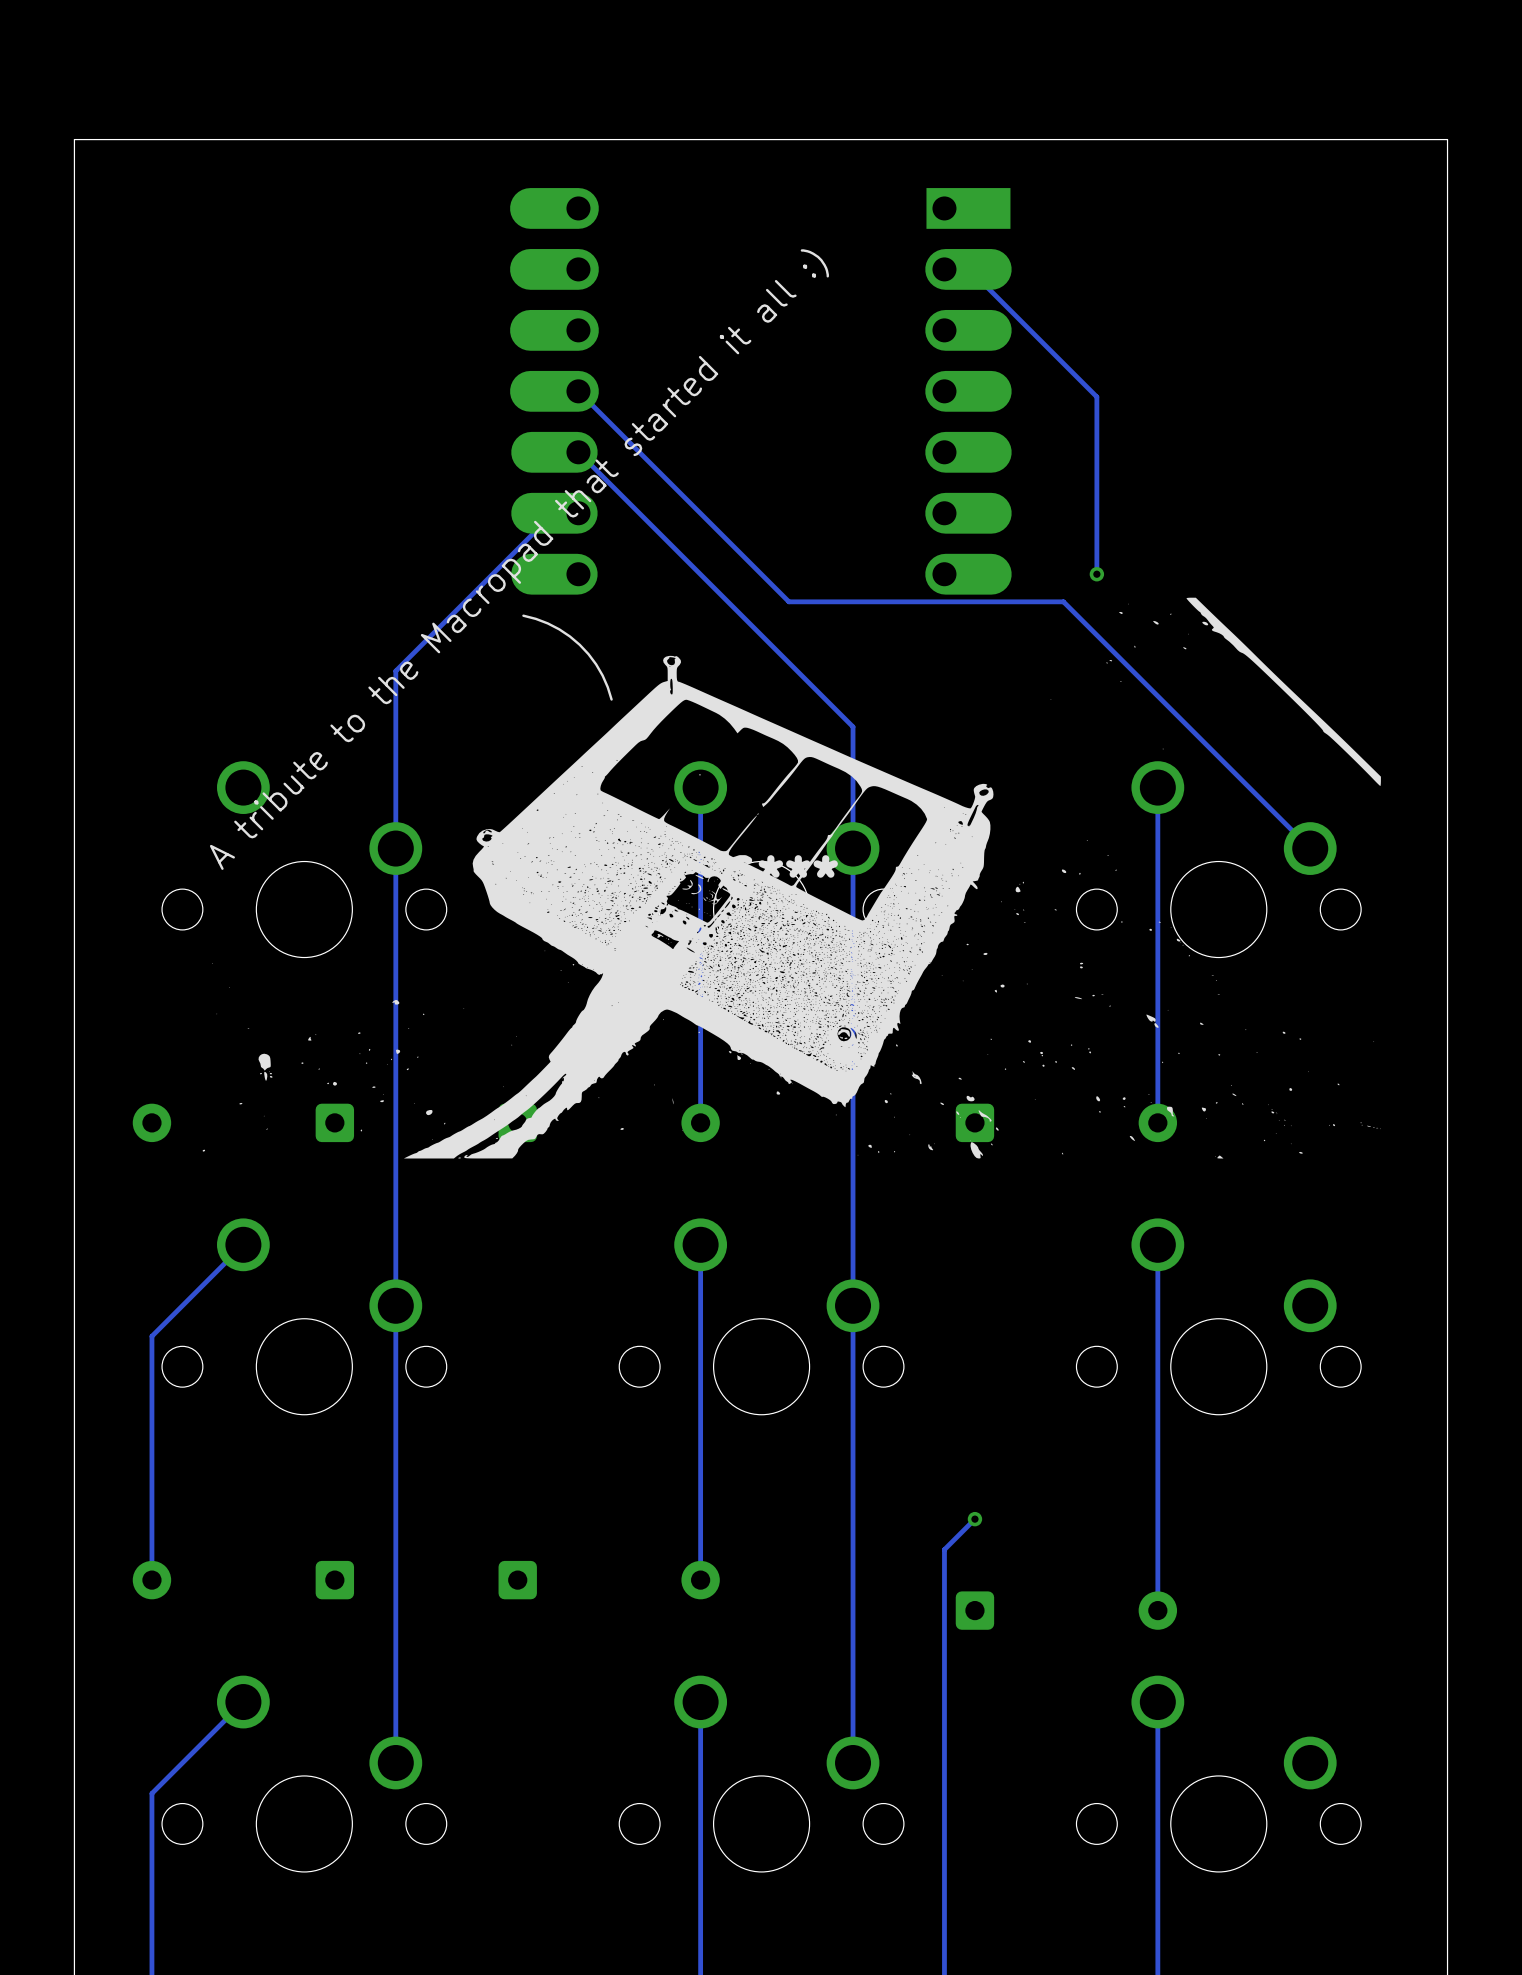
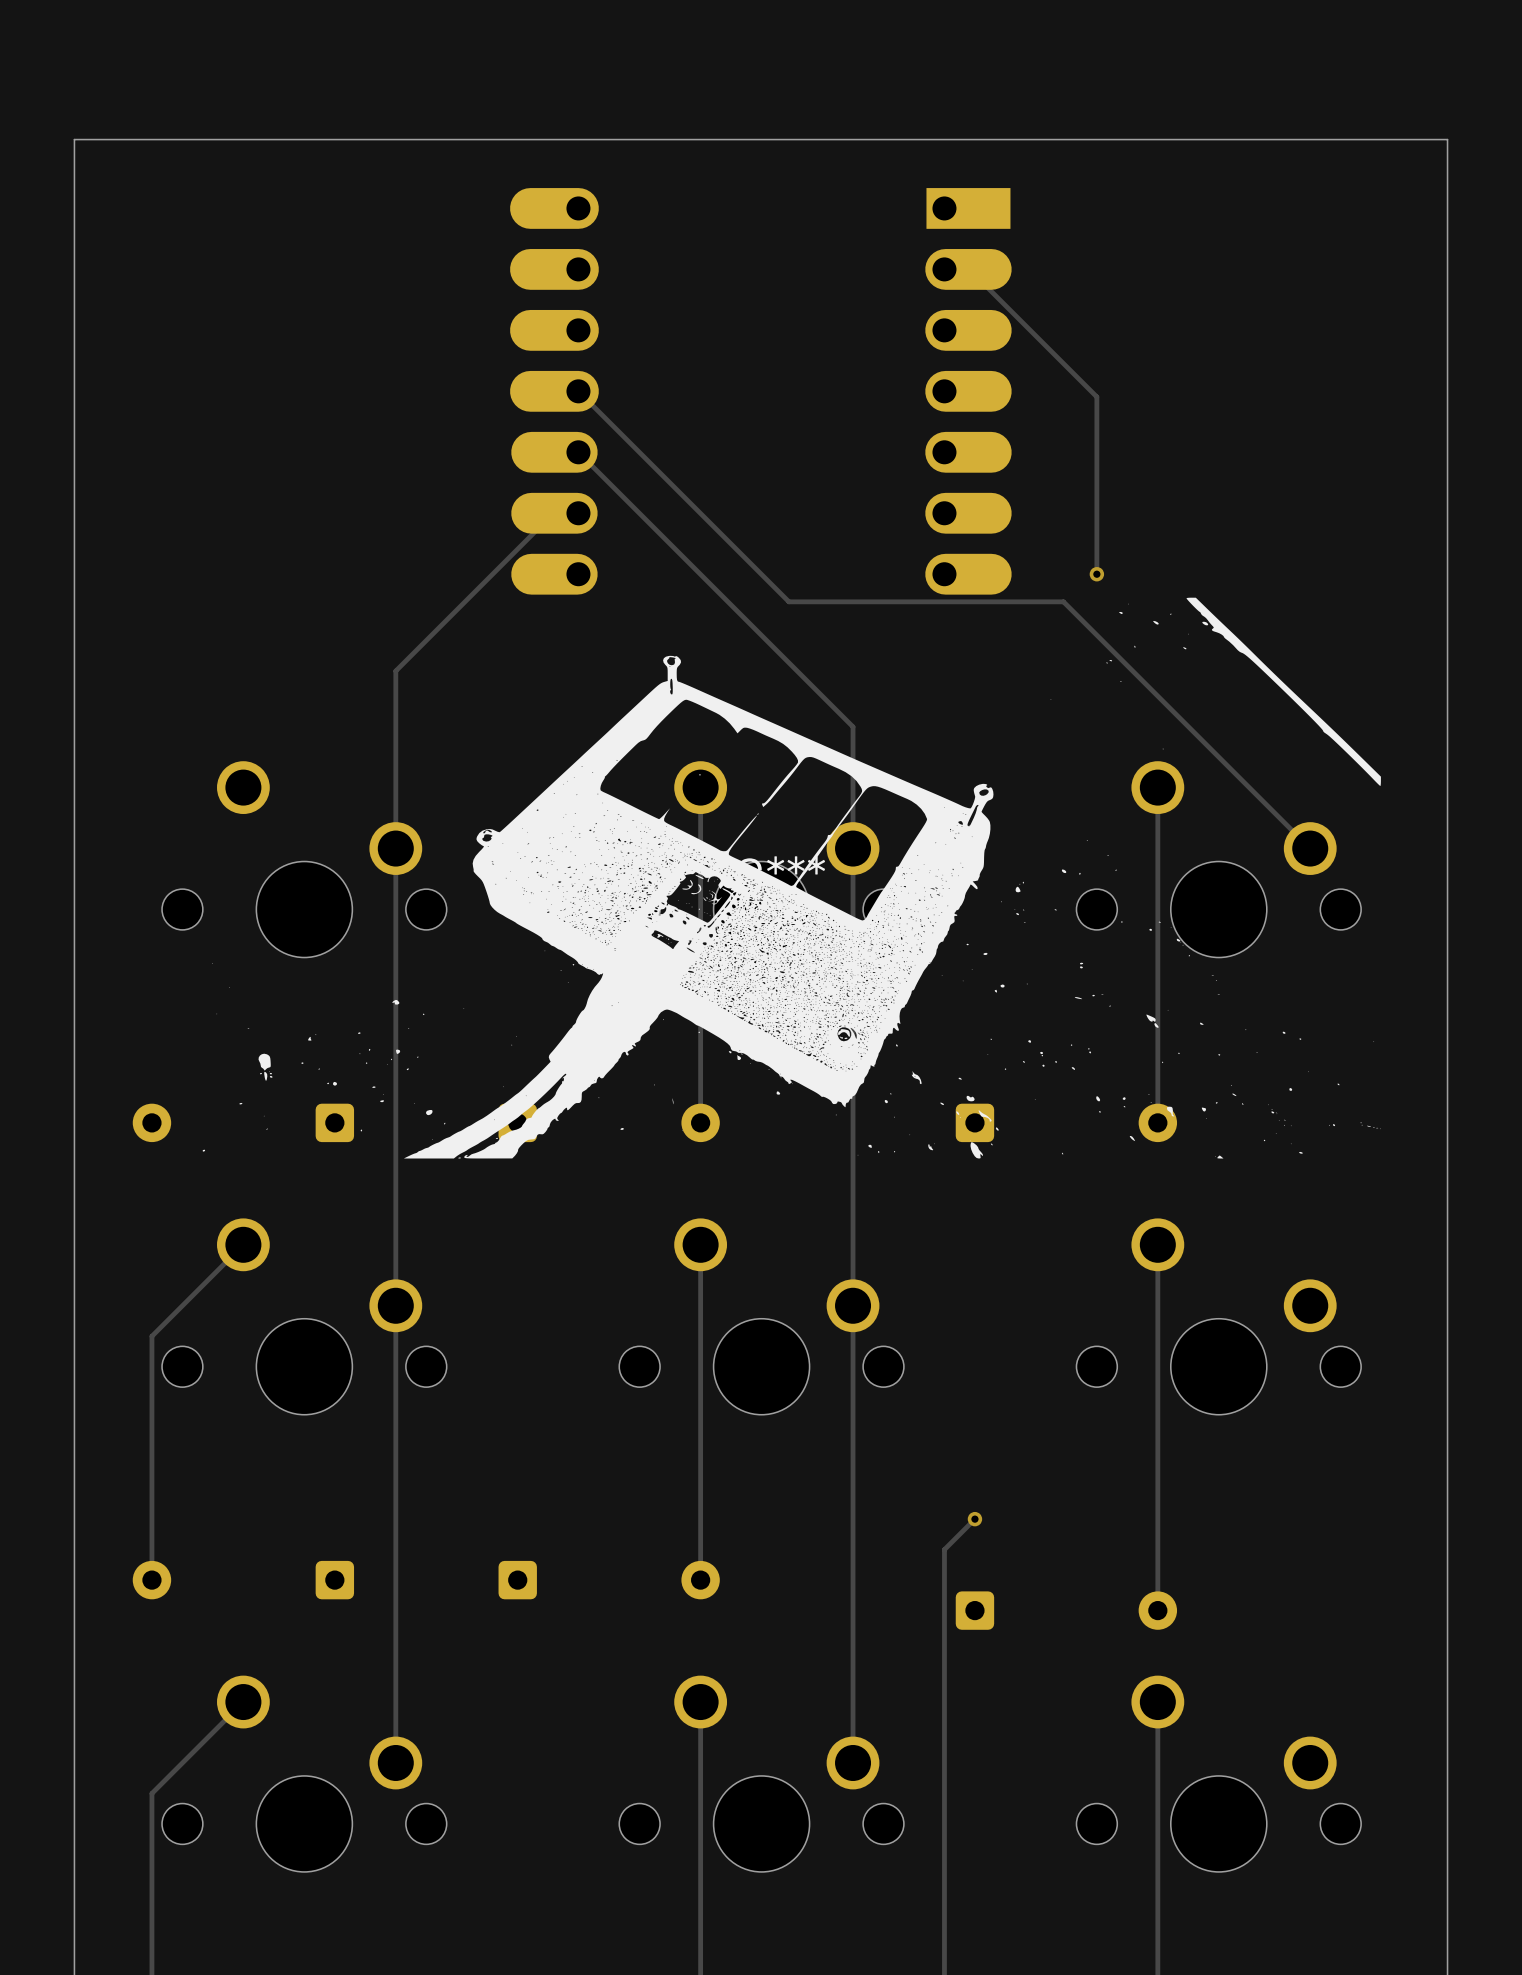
text: A tribute to the Macropad that started it all :) (519, 559) -> none
line: (523, 615) (547, 623) (579, 644) (596, 664) (611, 699) -> none

